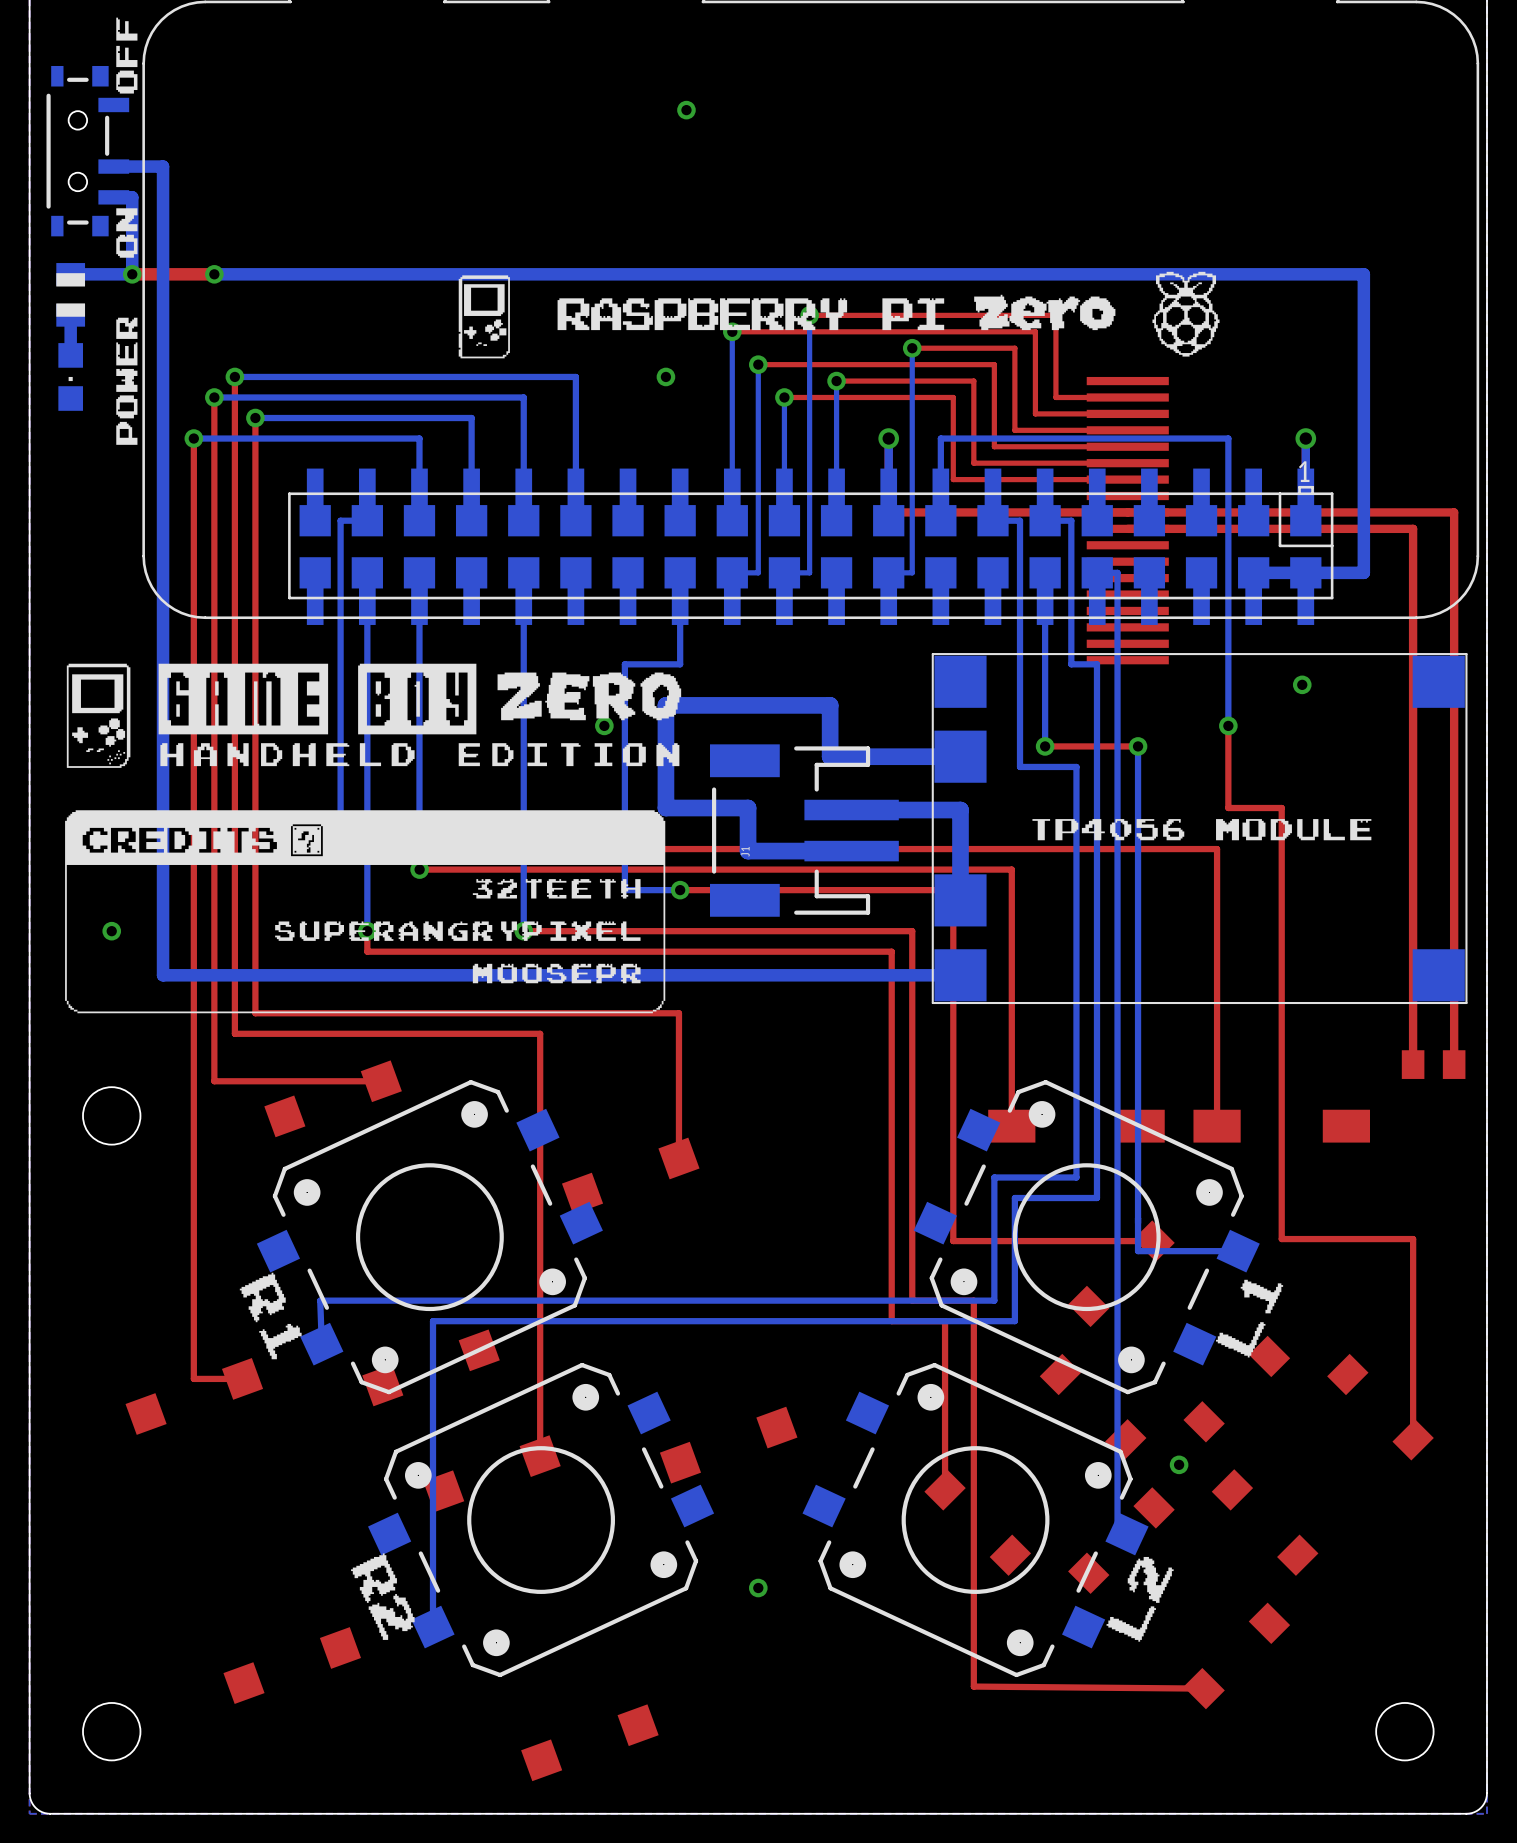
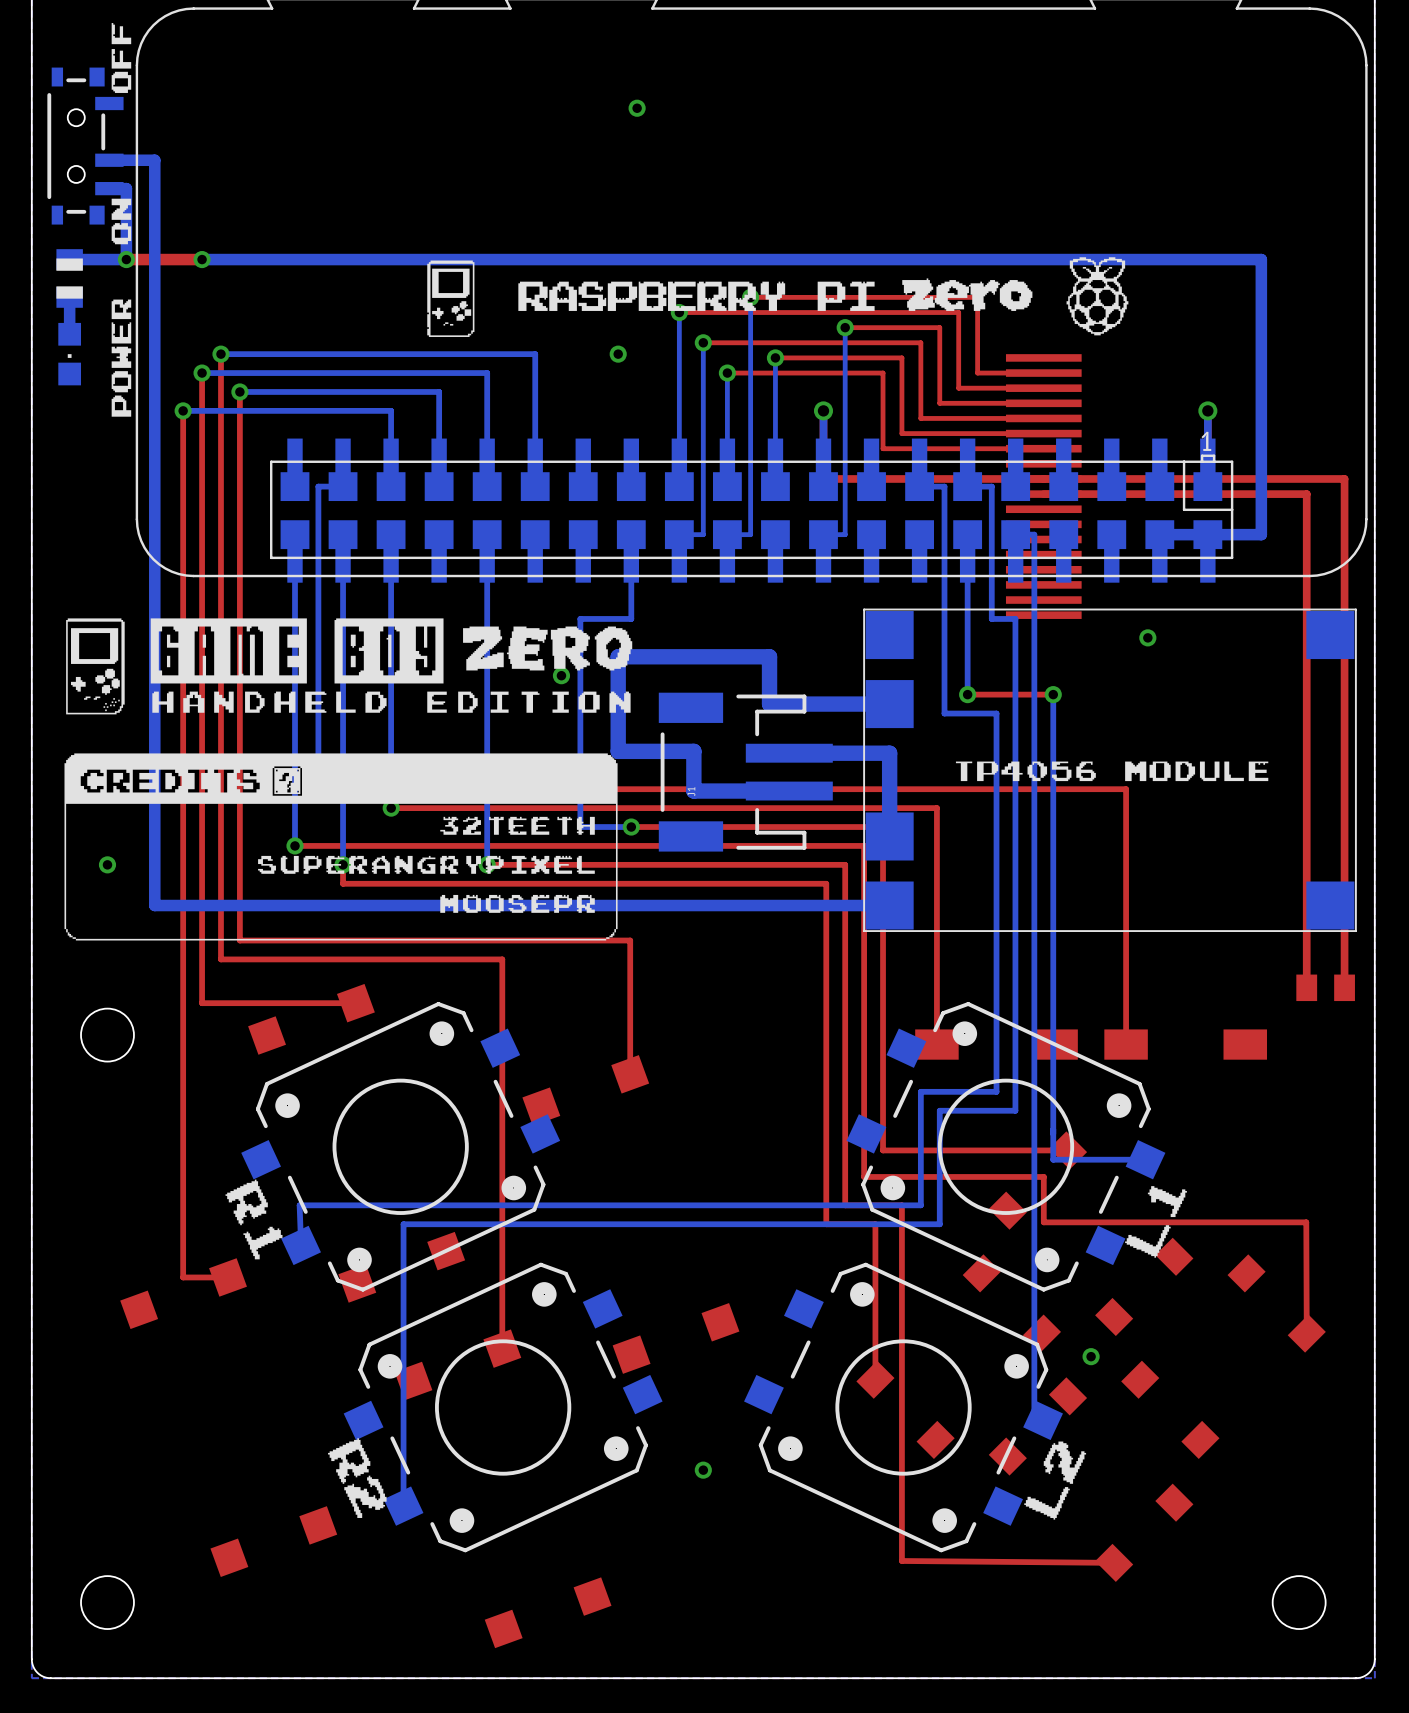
bottom track: (940, 520) (940, 438) (1228, 438) (1228, 725) -> none
bottom track: none -> (295, 562) (295, 845)
via: none -> (1147, 637)
via: (1302, 684) -> none
top track: (1228, 725) (1228, 808) (1281, 808) (1281, 1239) (1413, 1239) (1413, 1439) -> (295, 845) (864, 845) (864, 1176) (1043, 1176) (1043, 1222) (1306, 1222) (1306, 1333)
via: (1228, 725) -> none
via: none -> (295, 845)

